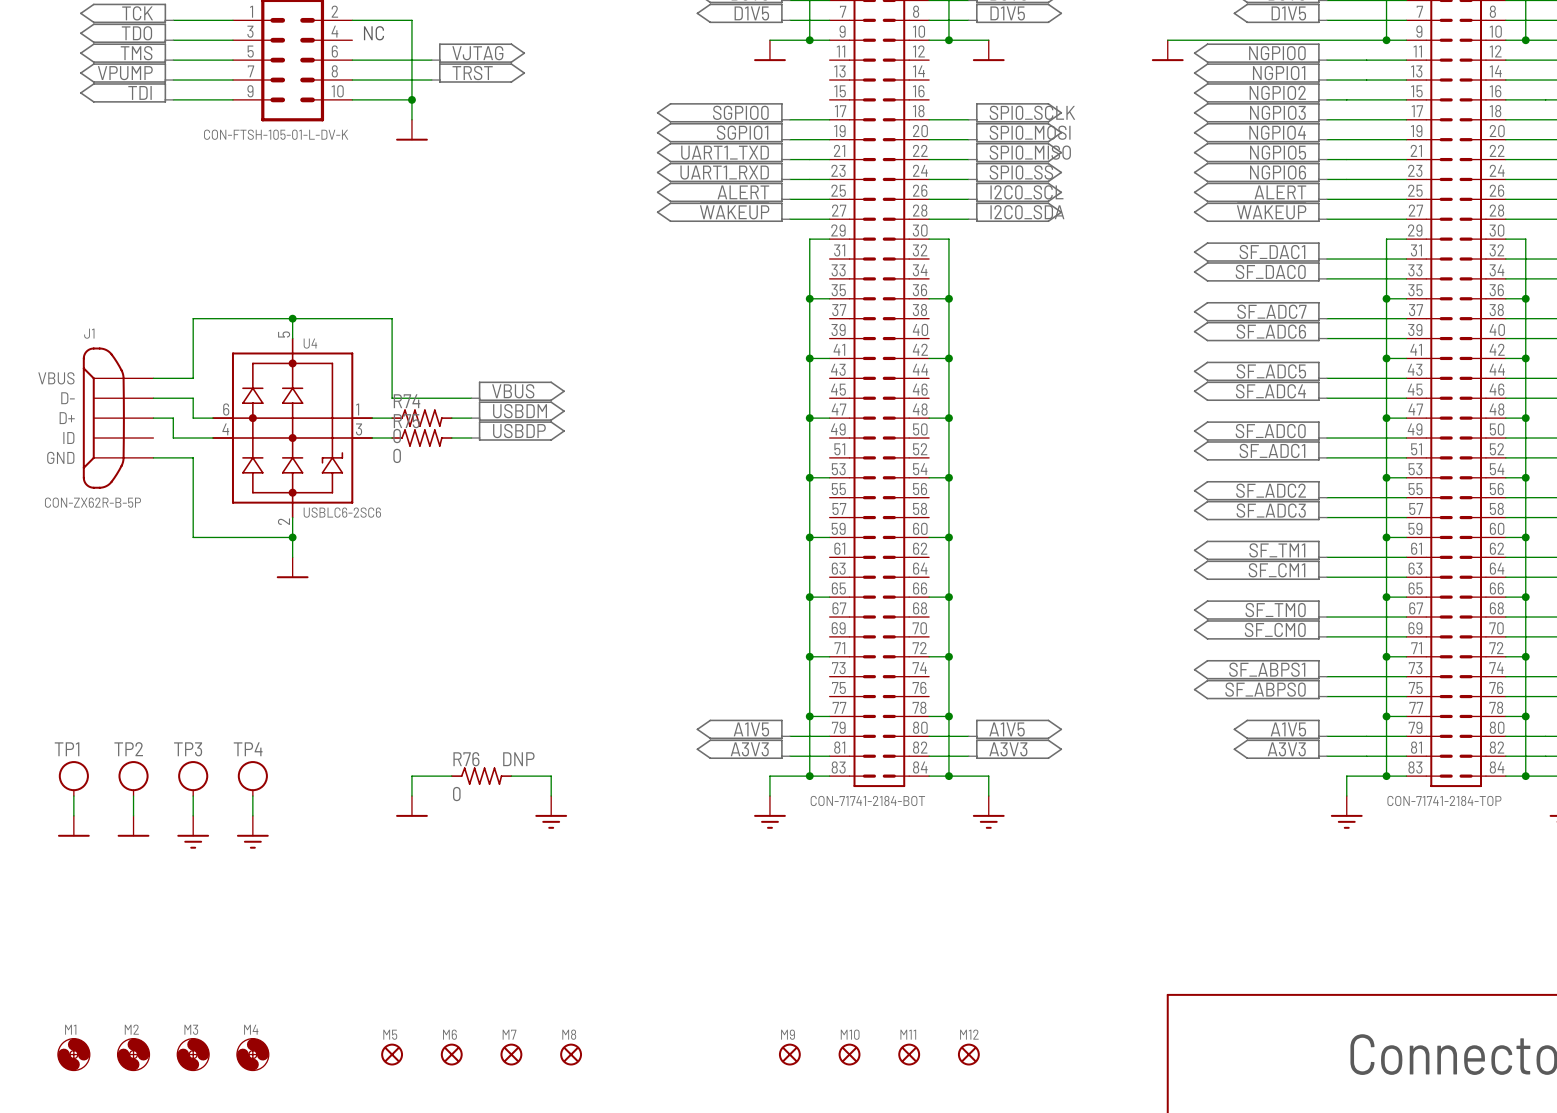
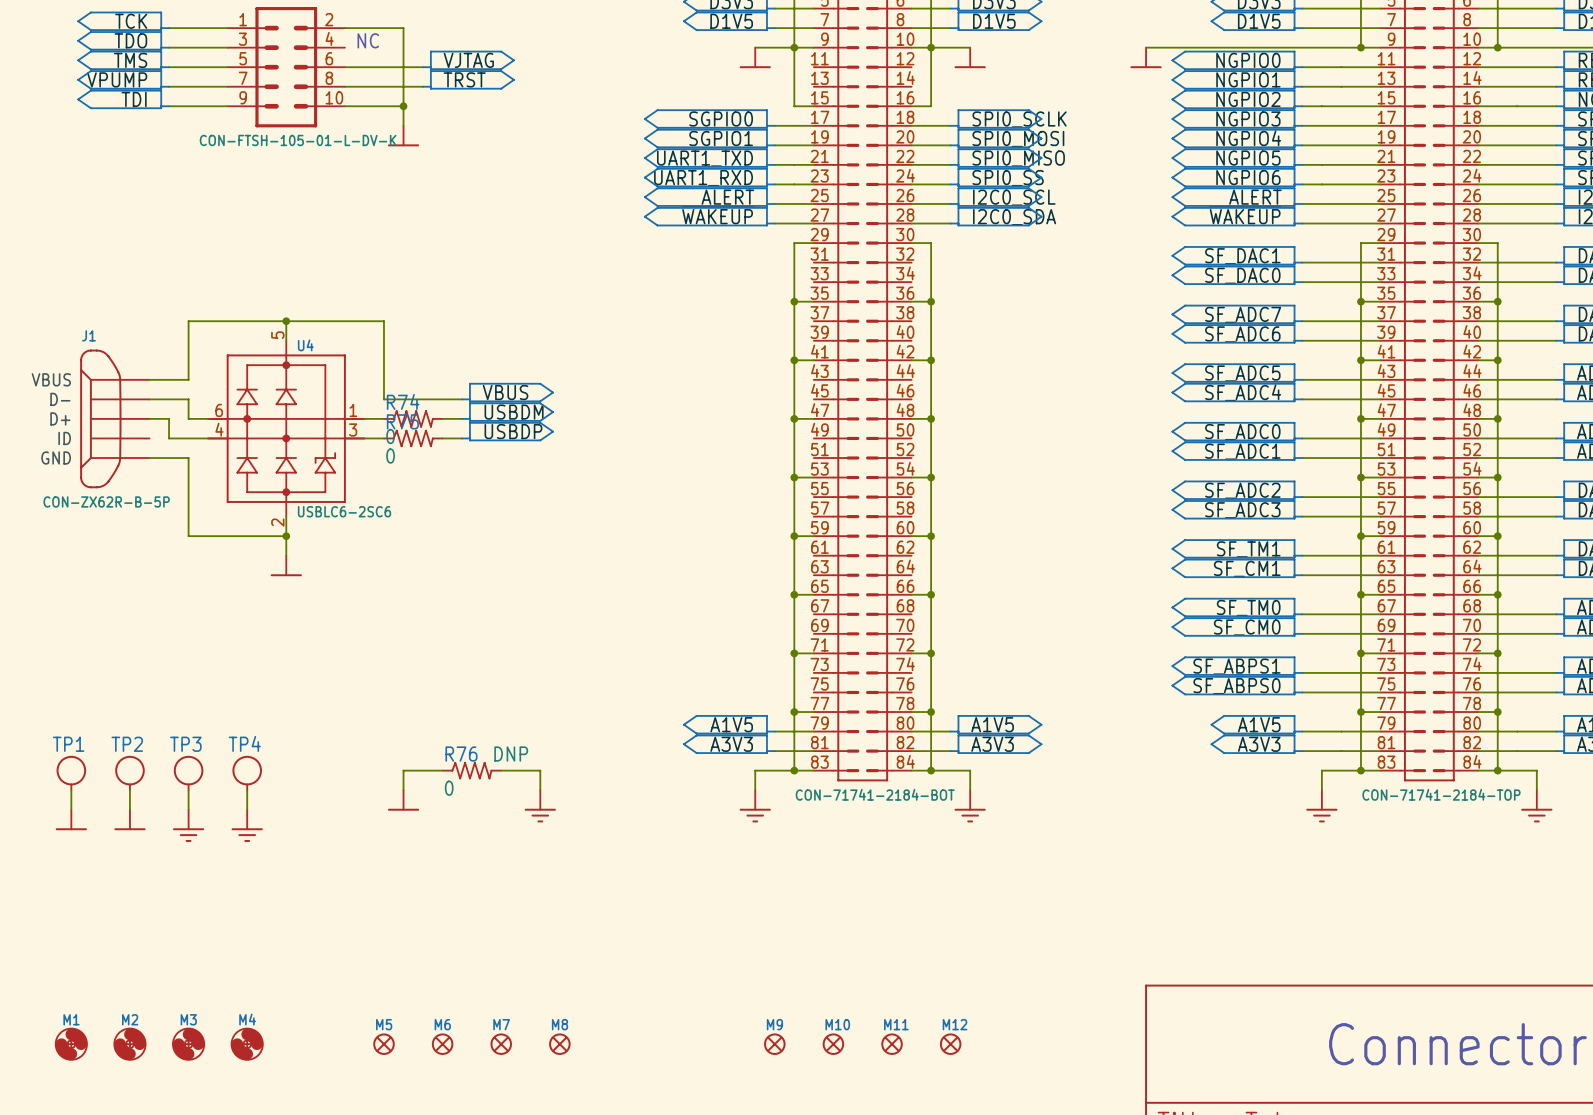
wire: none -> (794, 47) (794, 106) (813, 106)
wire: none -> (931, 47) (931, 106) (911, 106)

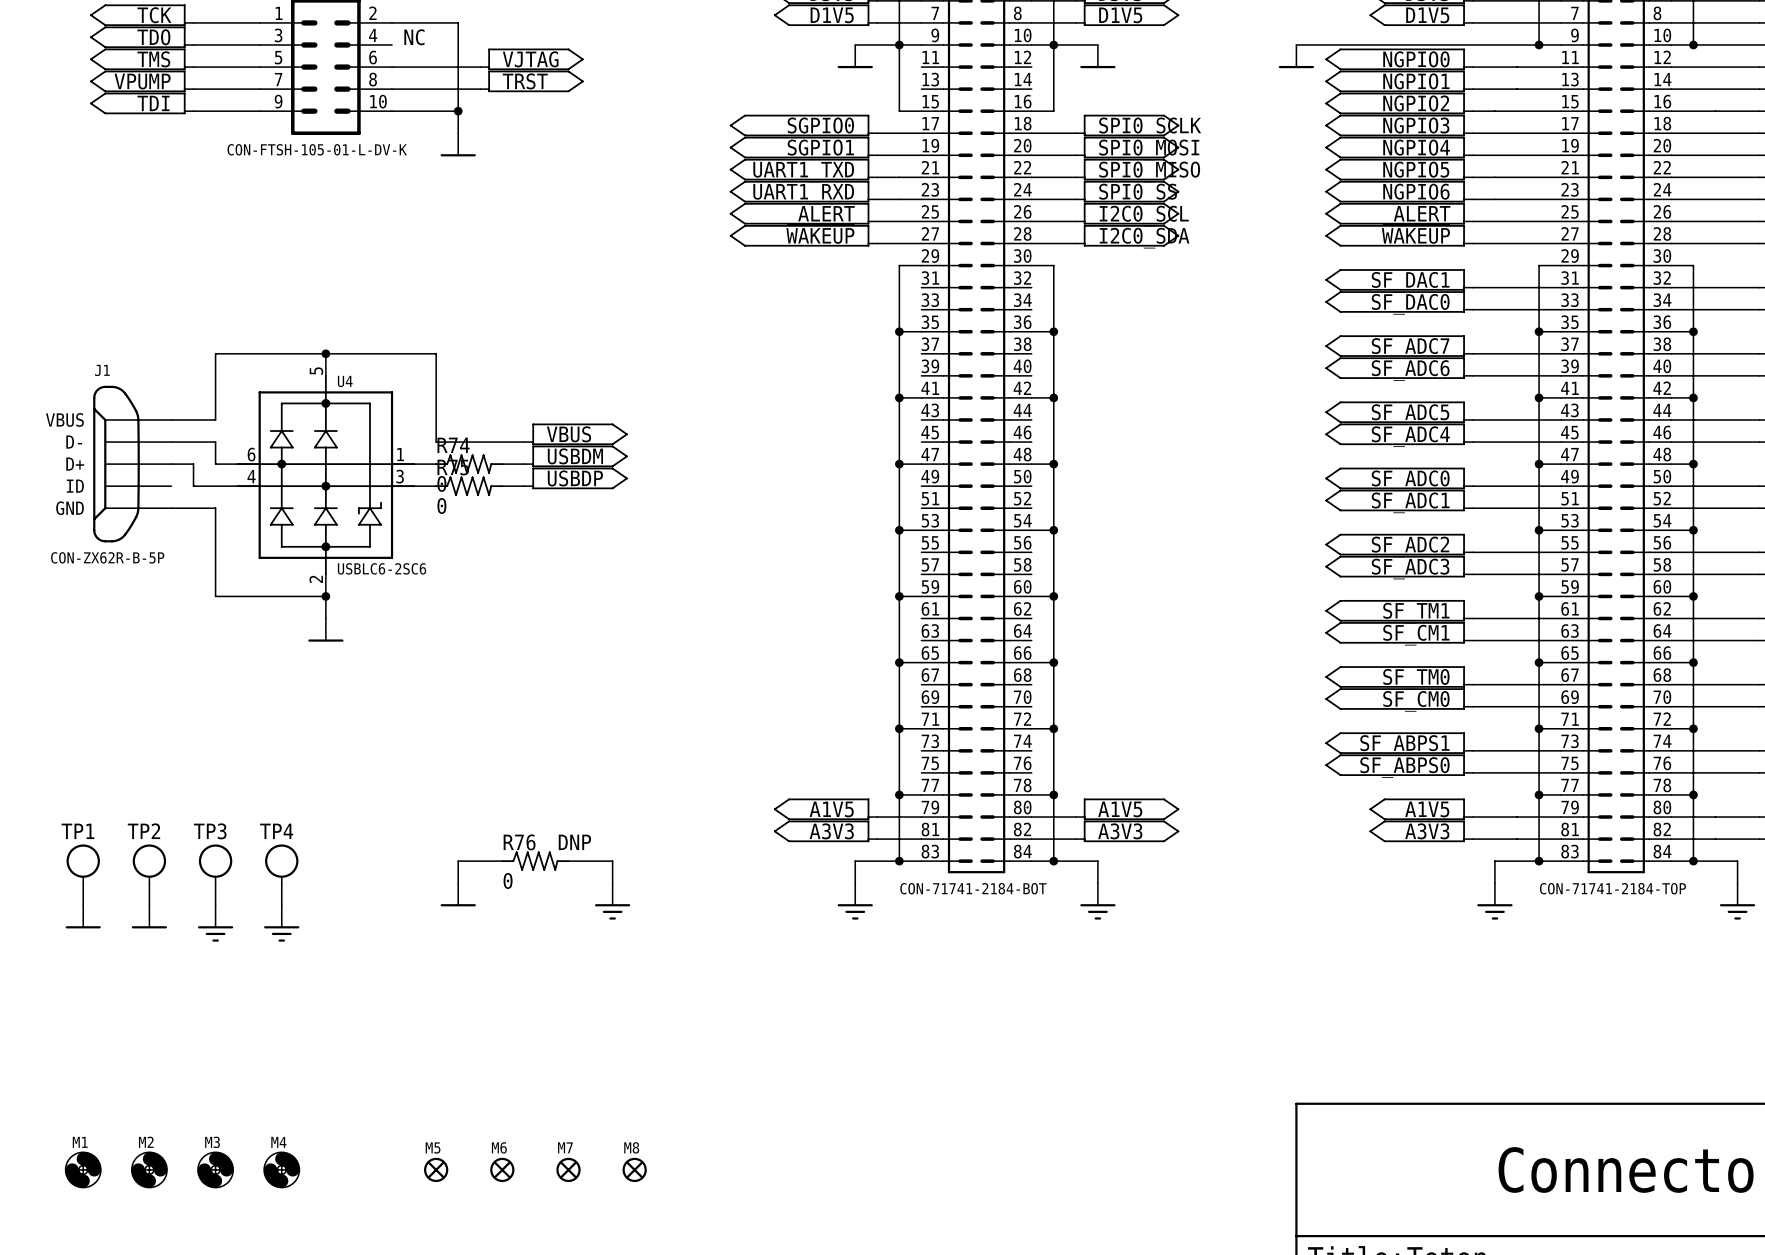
M9: (774, 1044) -> none
M10: (833, 1044) -> none
M11: (892, 1044) -> none
M12: (950, 1044) -> none

